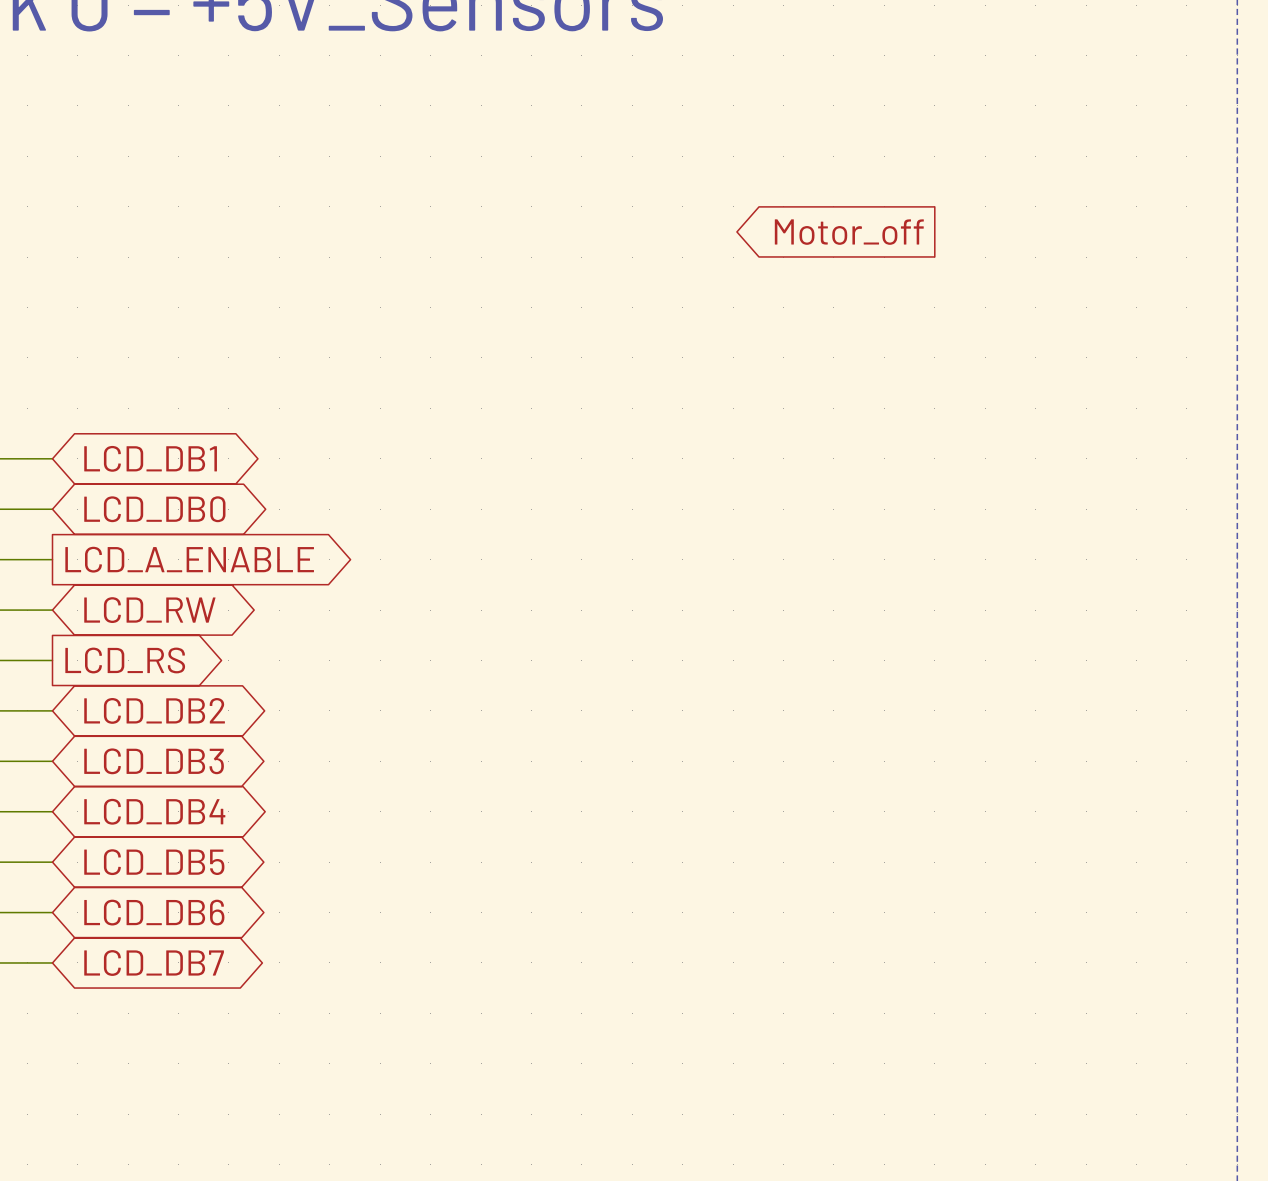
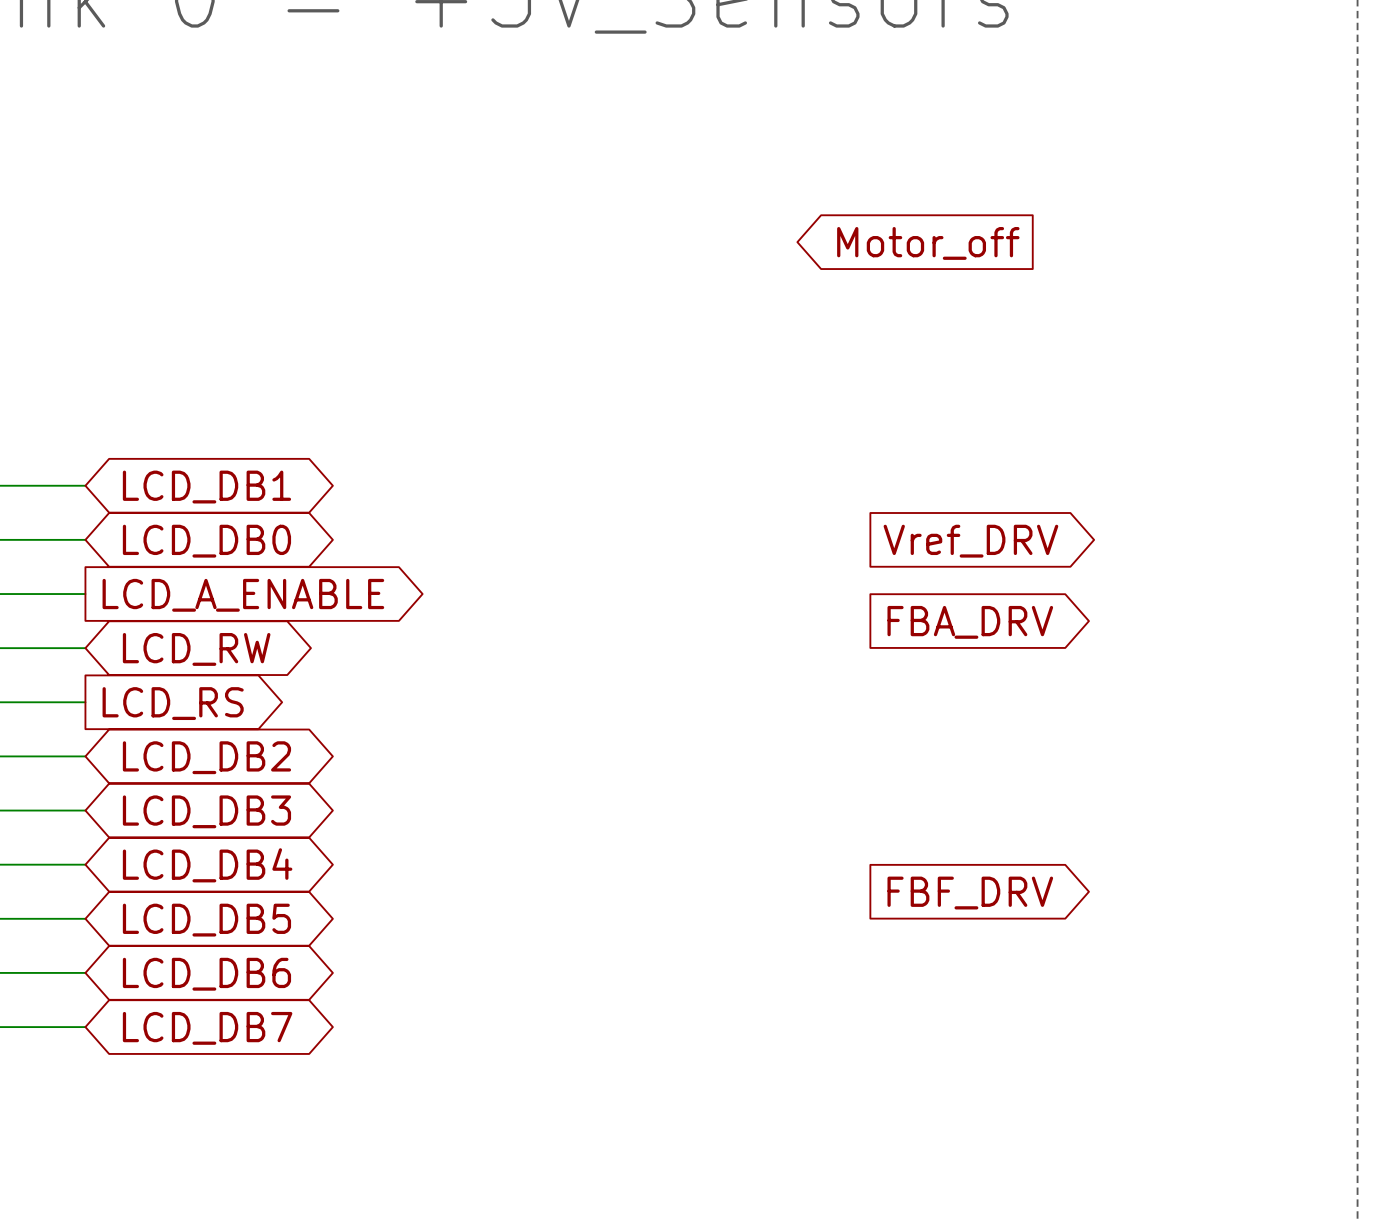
global label: none -> Vref_DRV (970, 541)
global label: none -> FBA_DRV (970, 622)
global label: none -> FBF_DRV (970, 893)

